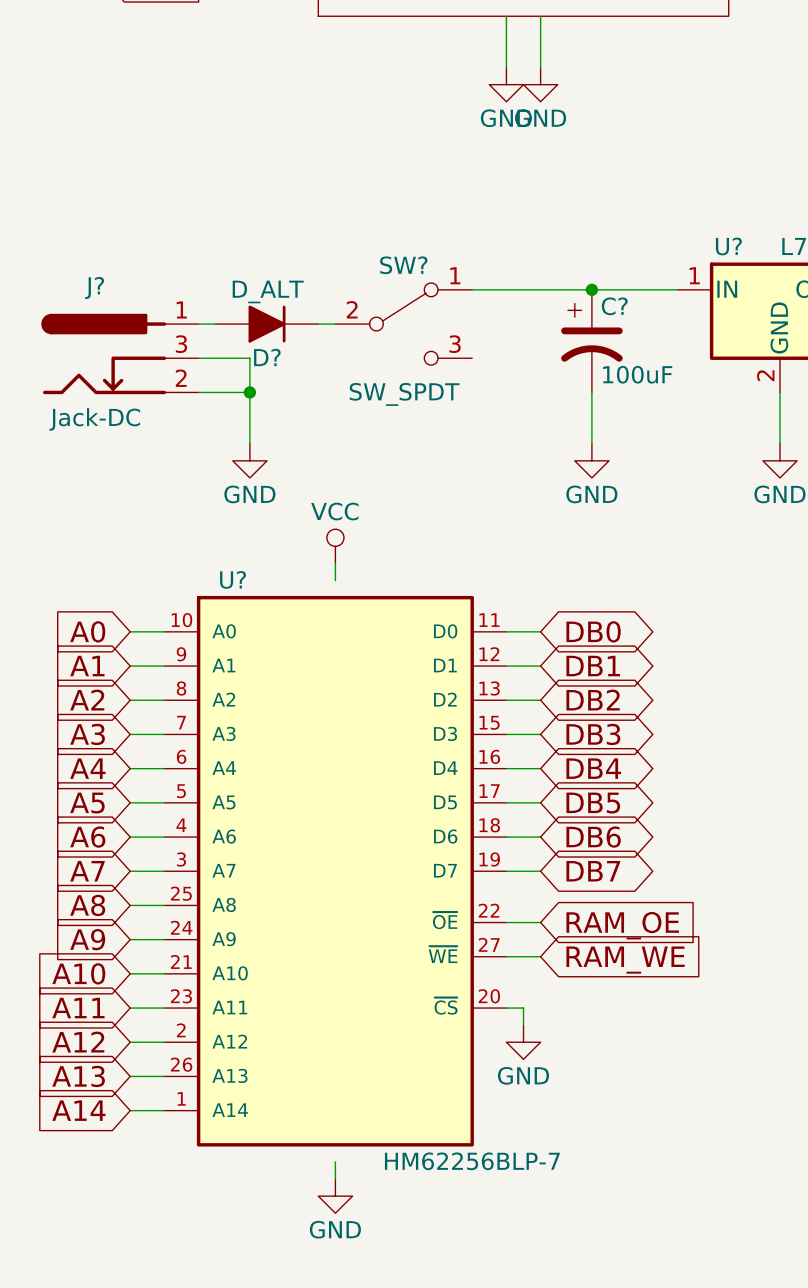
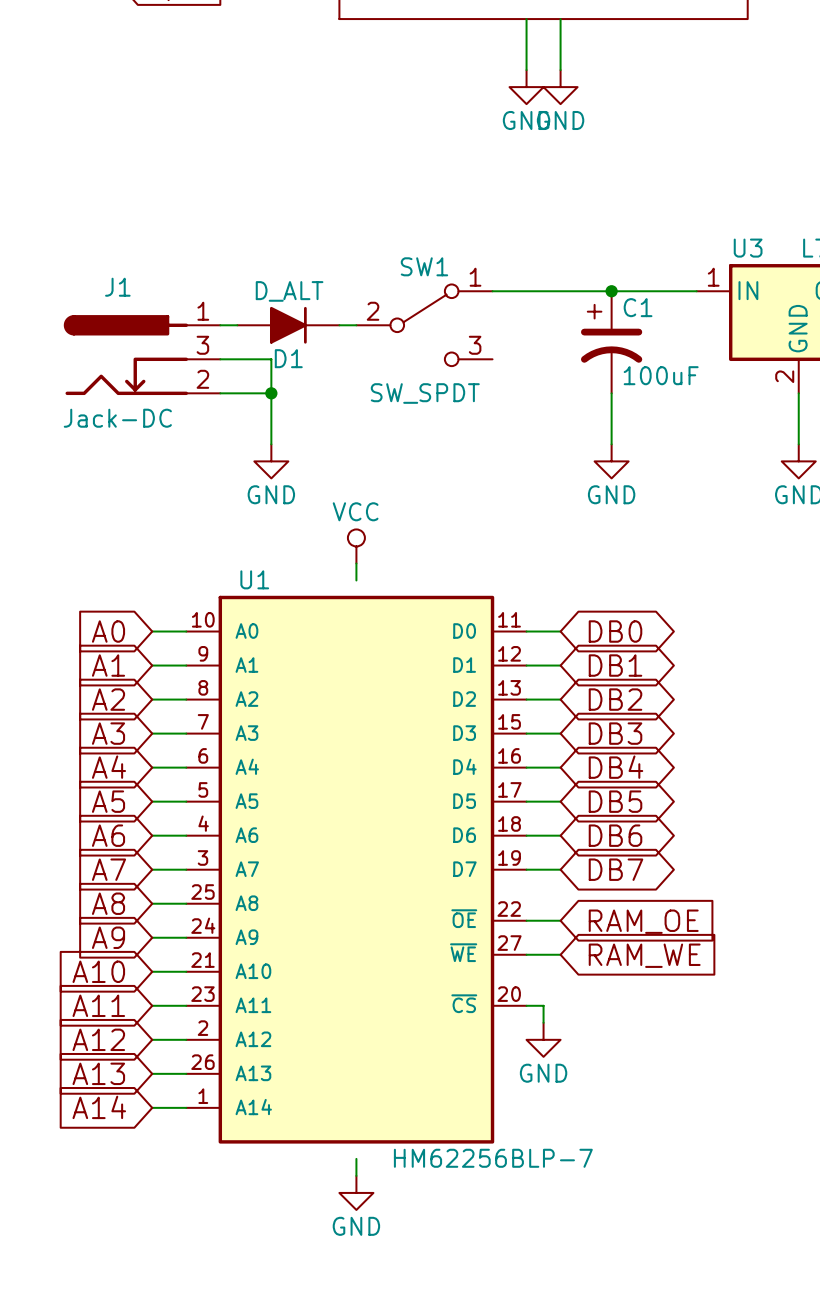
U? name: U? (728, 246) -> U3 (748, 248)
SW? name: SW? (403, 265) -> SW1 (424, 266)
J? name: J? (94, 287) -> J1 (117, 287)
C? name: C? (614, 306) -> C1 (638, 307)
D? name: D? (267, 357) -> D1 (288, 358)
U? name: U? (233, 579) -> U1 (254, 579)

